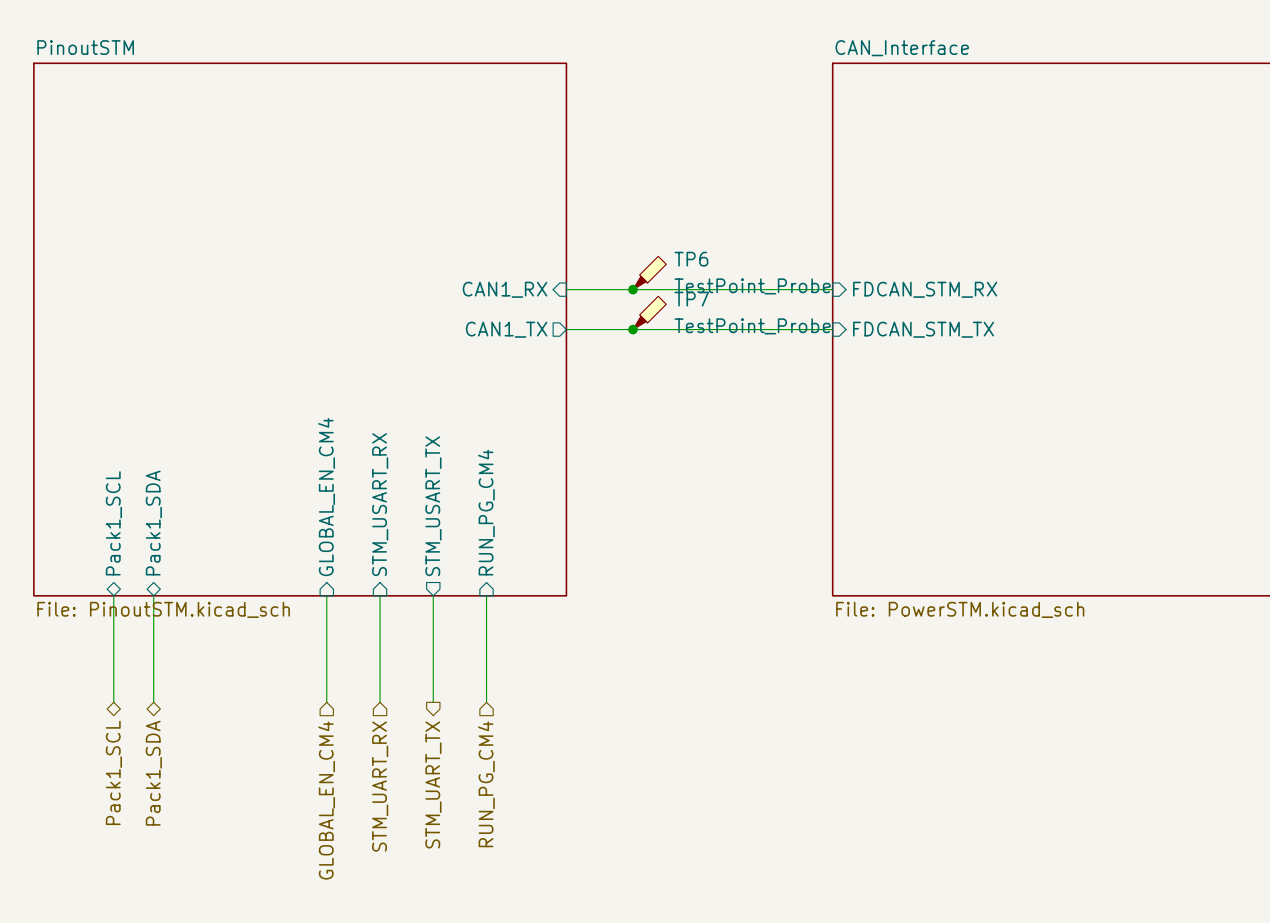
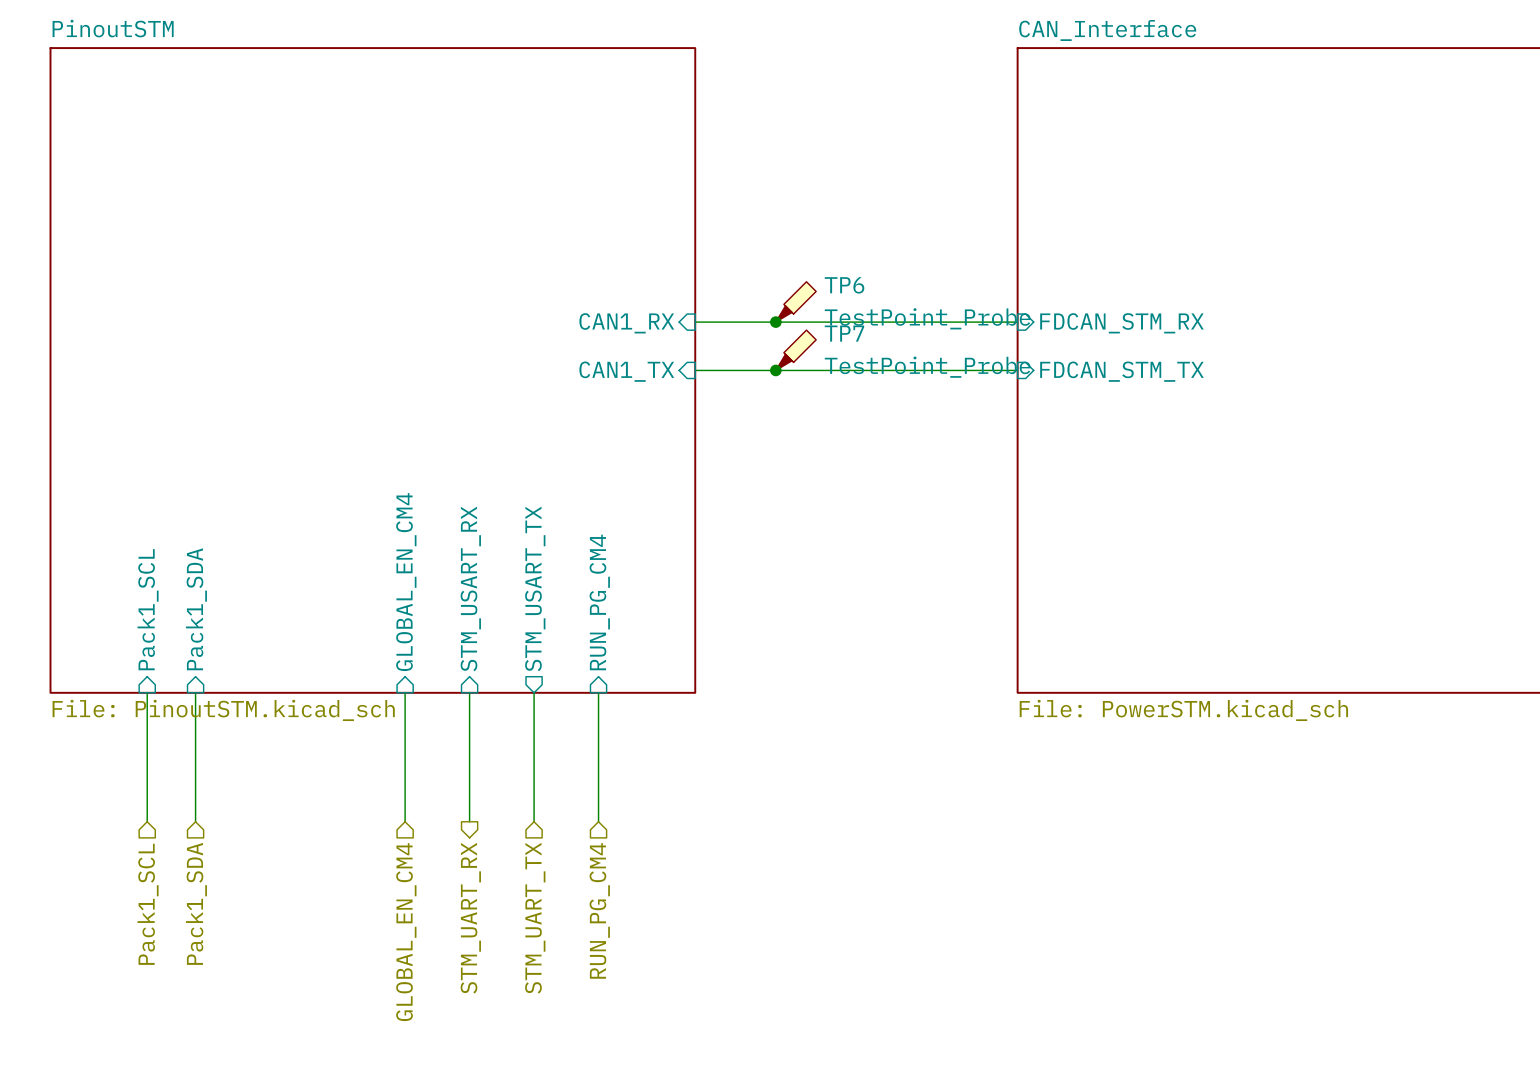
sheet pin shape: output (506, 329) -> input (626, 371)
sheet pin shape: bidirectional (113, 523) -> input (148, 609)
sheet pin shape: bidirectional (153, 523) -> input (196, 609)
hierarchical label shape: bidirectional (113, 772) -> input (148, 904)
hierarchical label shape: bidirectional (153, 773) -> input (196, 903)
hierarchical label shape: output (433, 784) -> input (535, 918)
hierarchical label shape: input (380, 786) -> output (470, 918)

